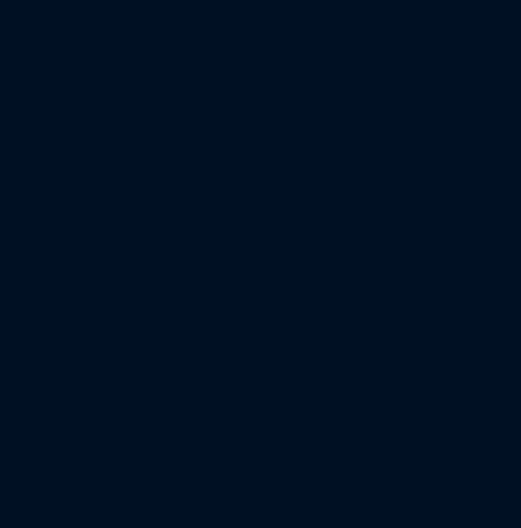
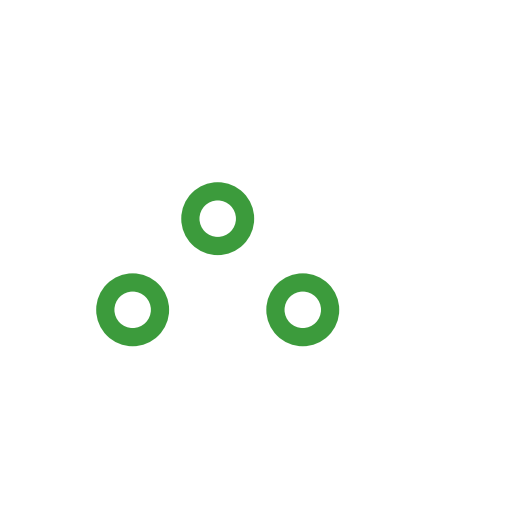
part: none -> (217, 264)

